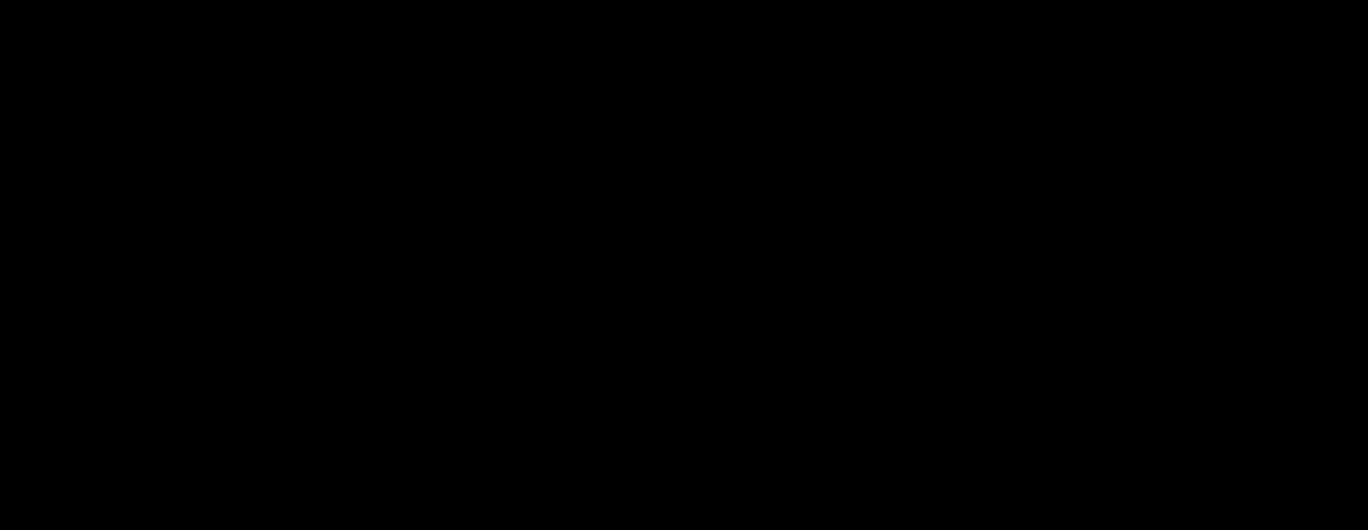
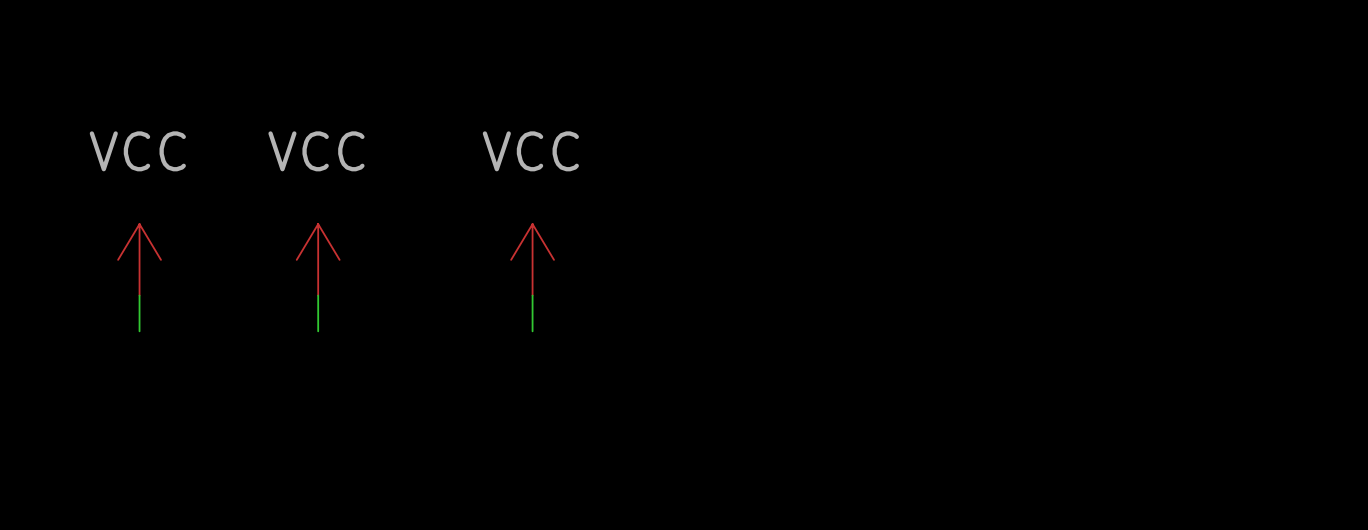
power symbol: none -> VCC (139, 259)
power symbol: none -> VCC (318, 259)
power symbol: none -> VCC (532, 259)
wire: none -> (139, 295) (139, 331)
wire: none -> (318, 295) (318, 331)
wire: none -> (532, 295) (532, 331)

